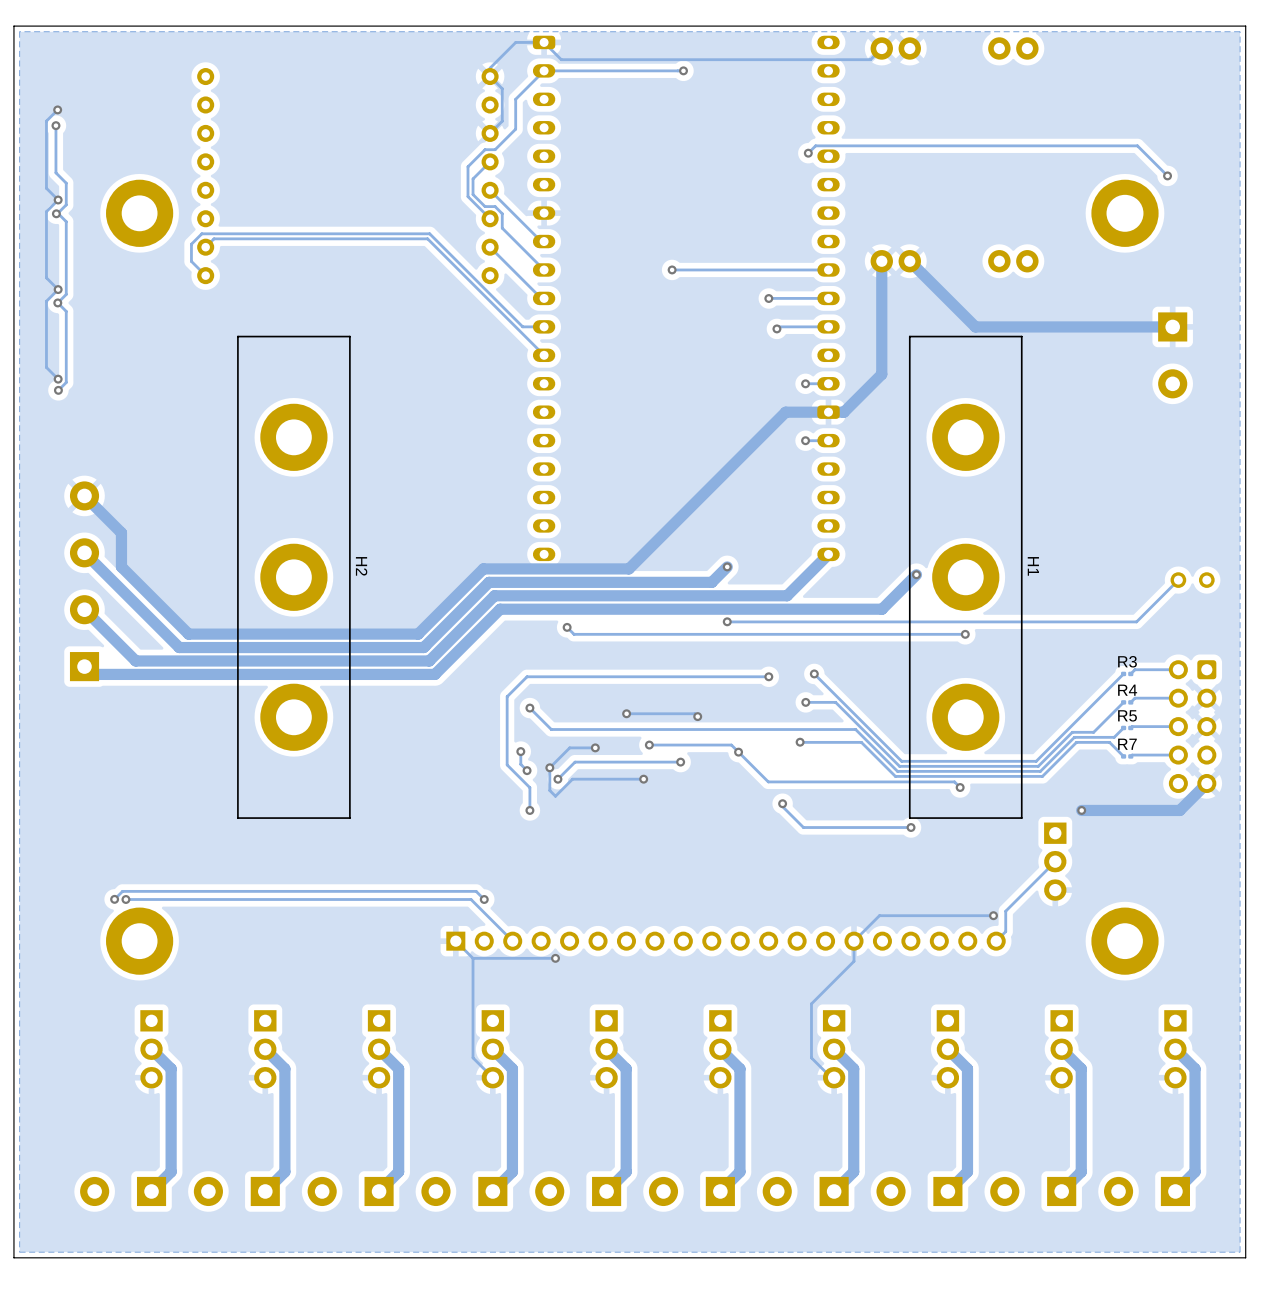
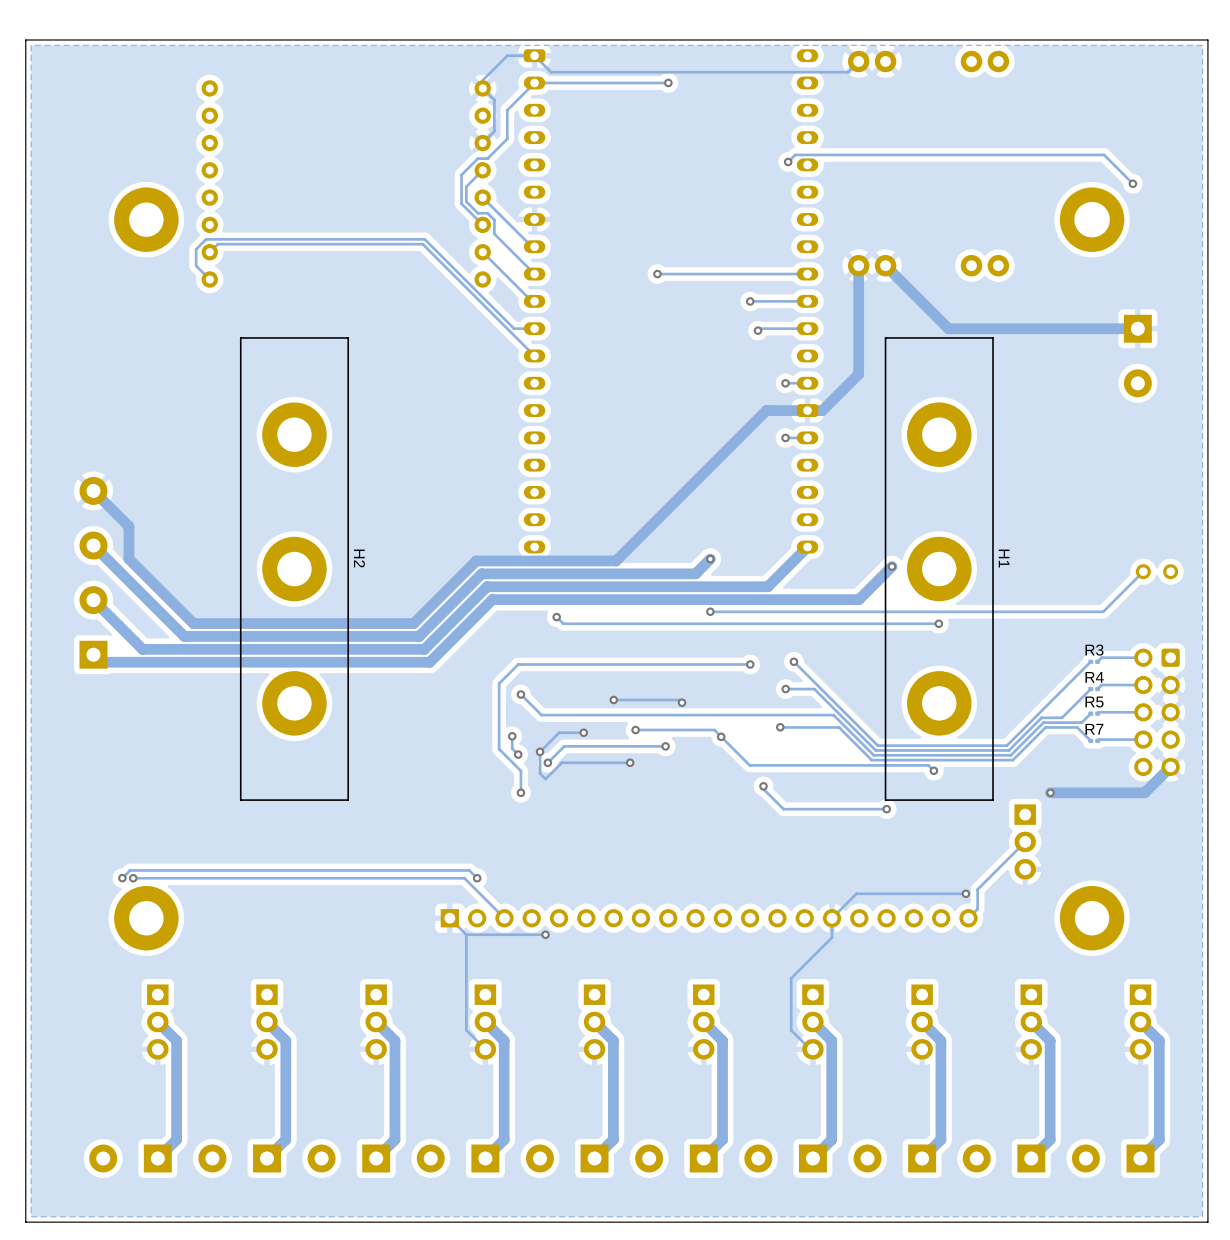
track: (57, 109) (46, 121) (46, 188) (58, 199) (46, 211) (46, 277) (58, 289) (46, 301) (46, 367) (58, 379) -> none
via: (57, 109) -> none
track: (55, 125) (55, 172) (66, 183) (66, 204) (57, 213) -> none
via: (55, 125) -> none
via: (58, 199) -> none
track: (56, 213) (66, 221) (66, 294) (57, 302) (66, 311) (66, 382) (58, 390) -> none
via: (56, 213) -> none
via: (58, 289) -> none
via: (57, 302) -> none
via: (58, 379) -> none
via: (58, 390) -> none

